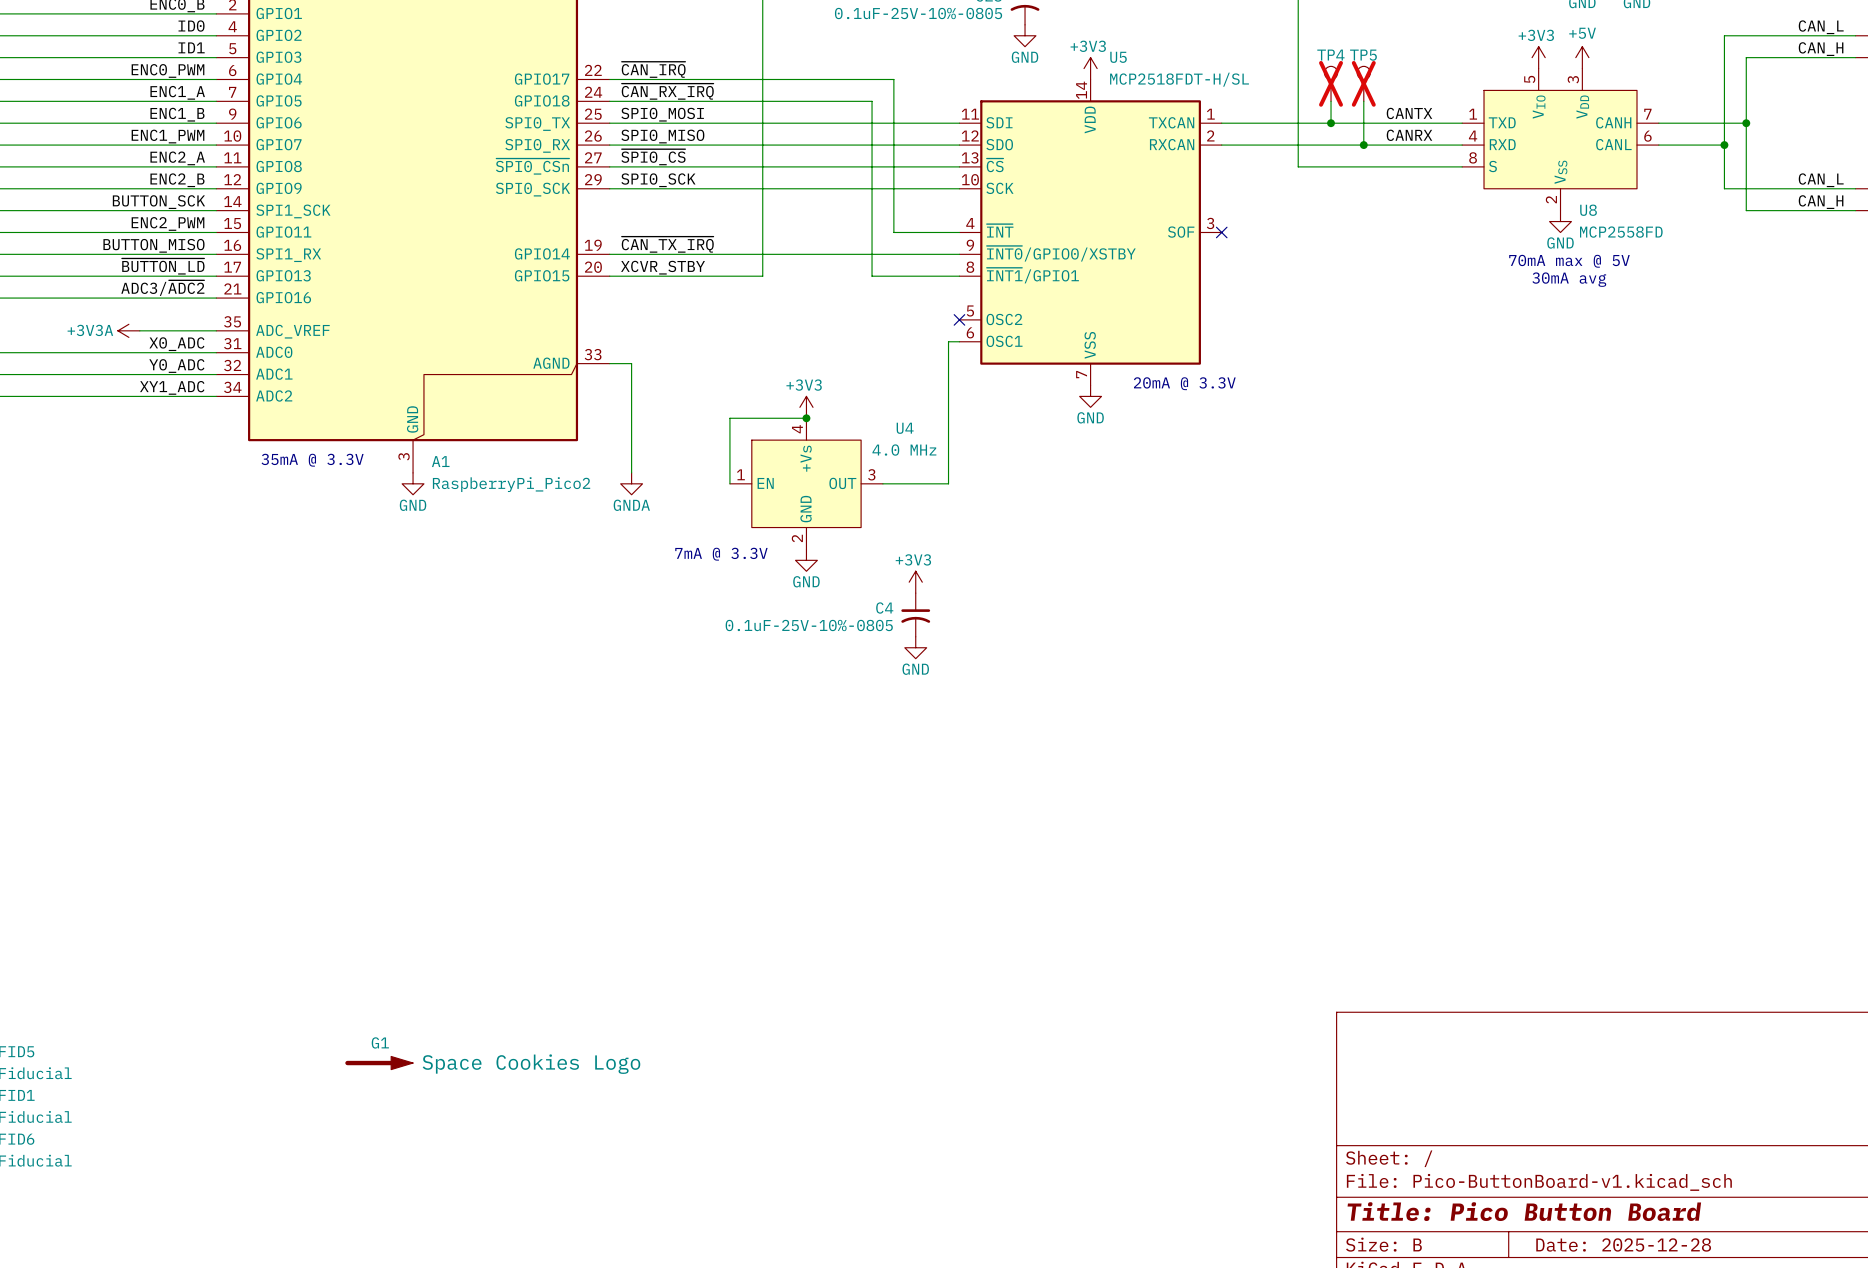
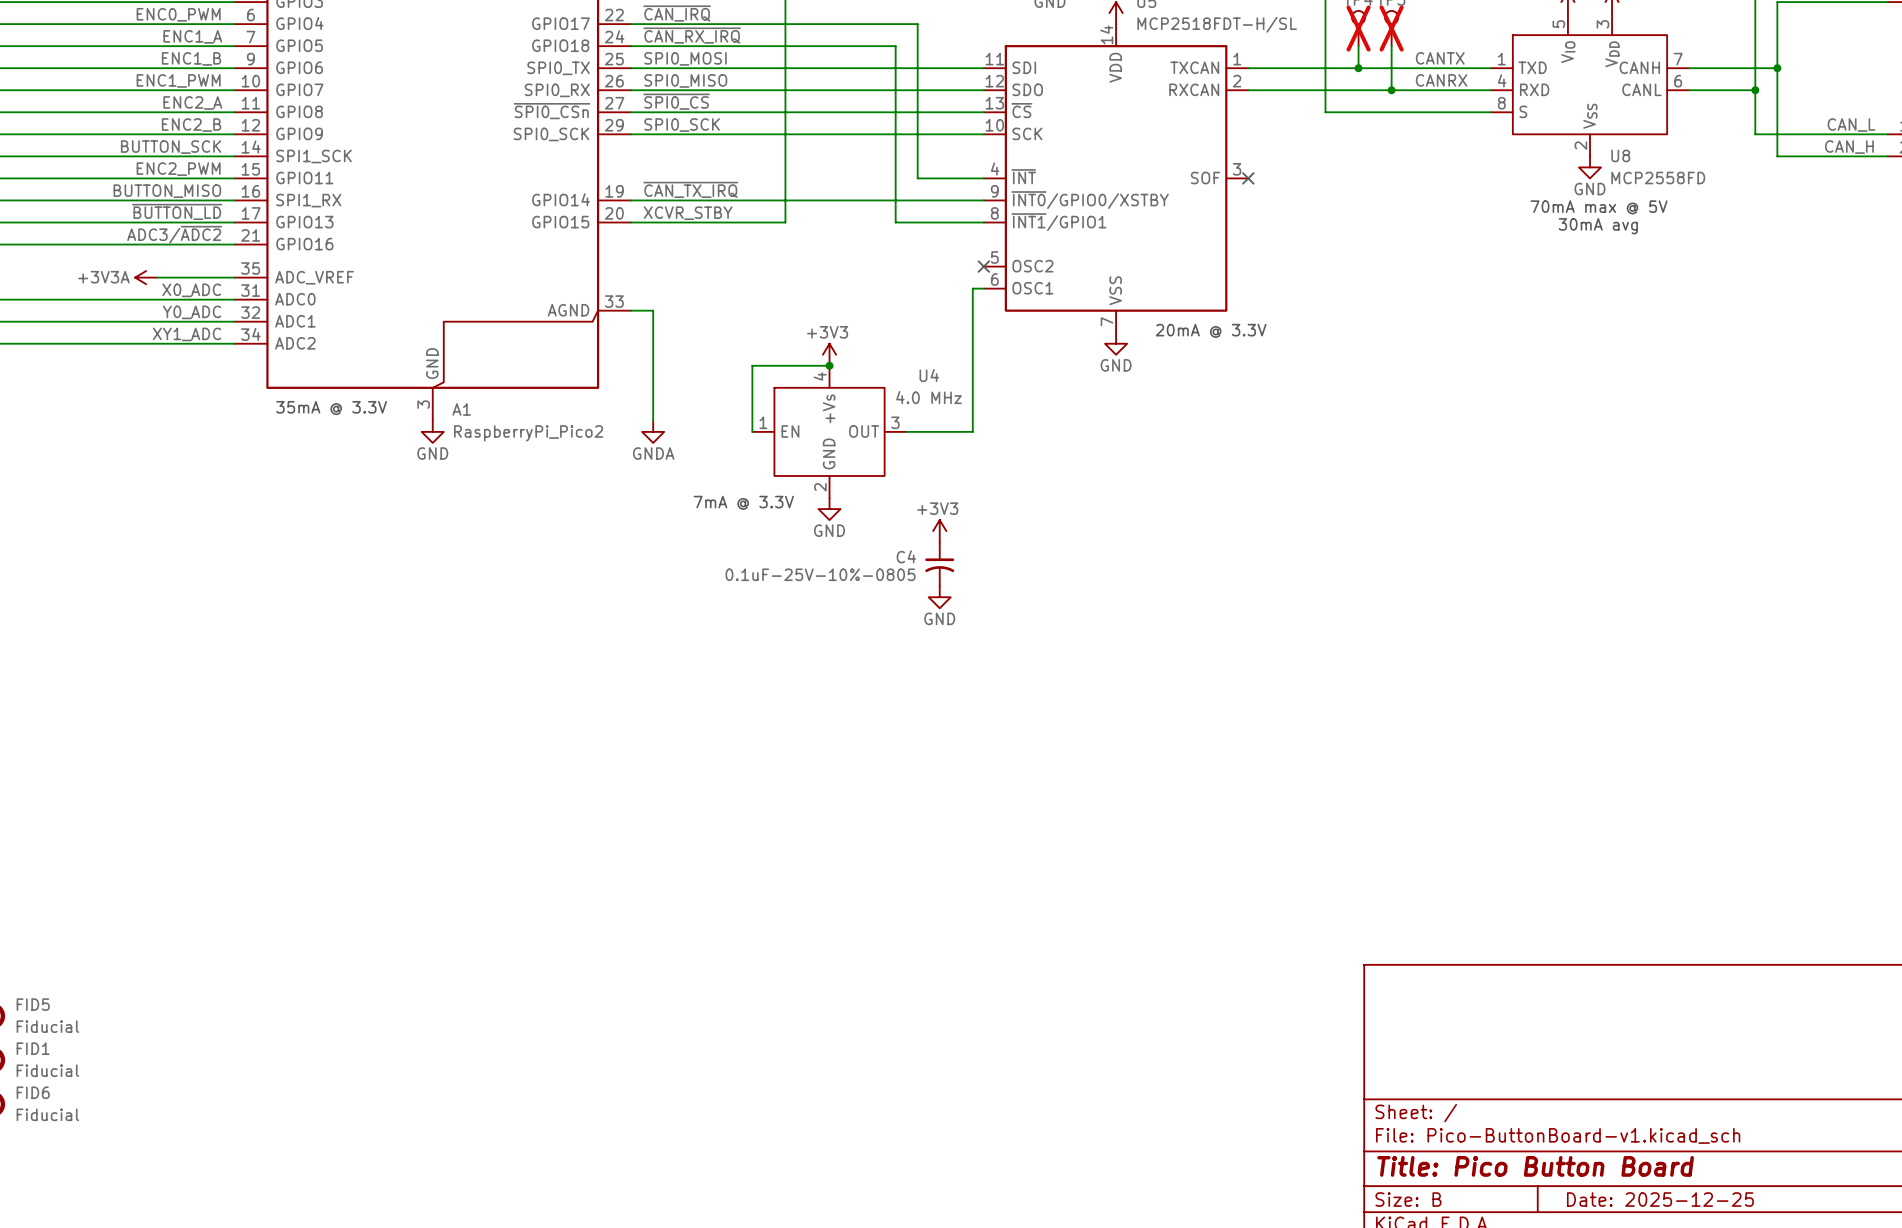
G1: Space Cookies Logo (379, 1063) -> none
title block: Date: 2025-12-28 (1623, 1244) -> Date: 2025-12-25 (1660, 1199)

